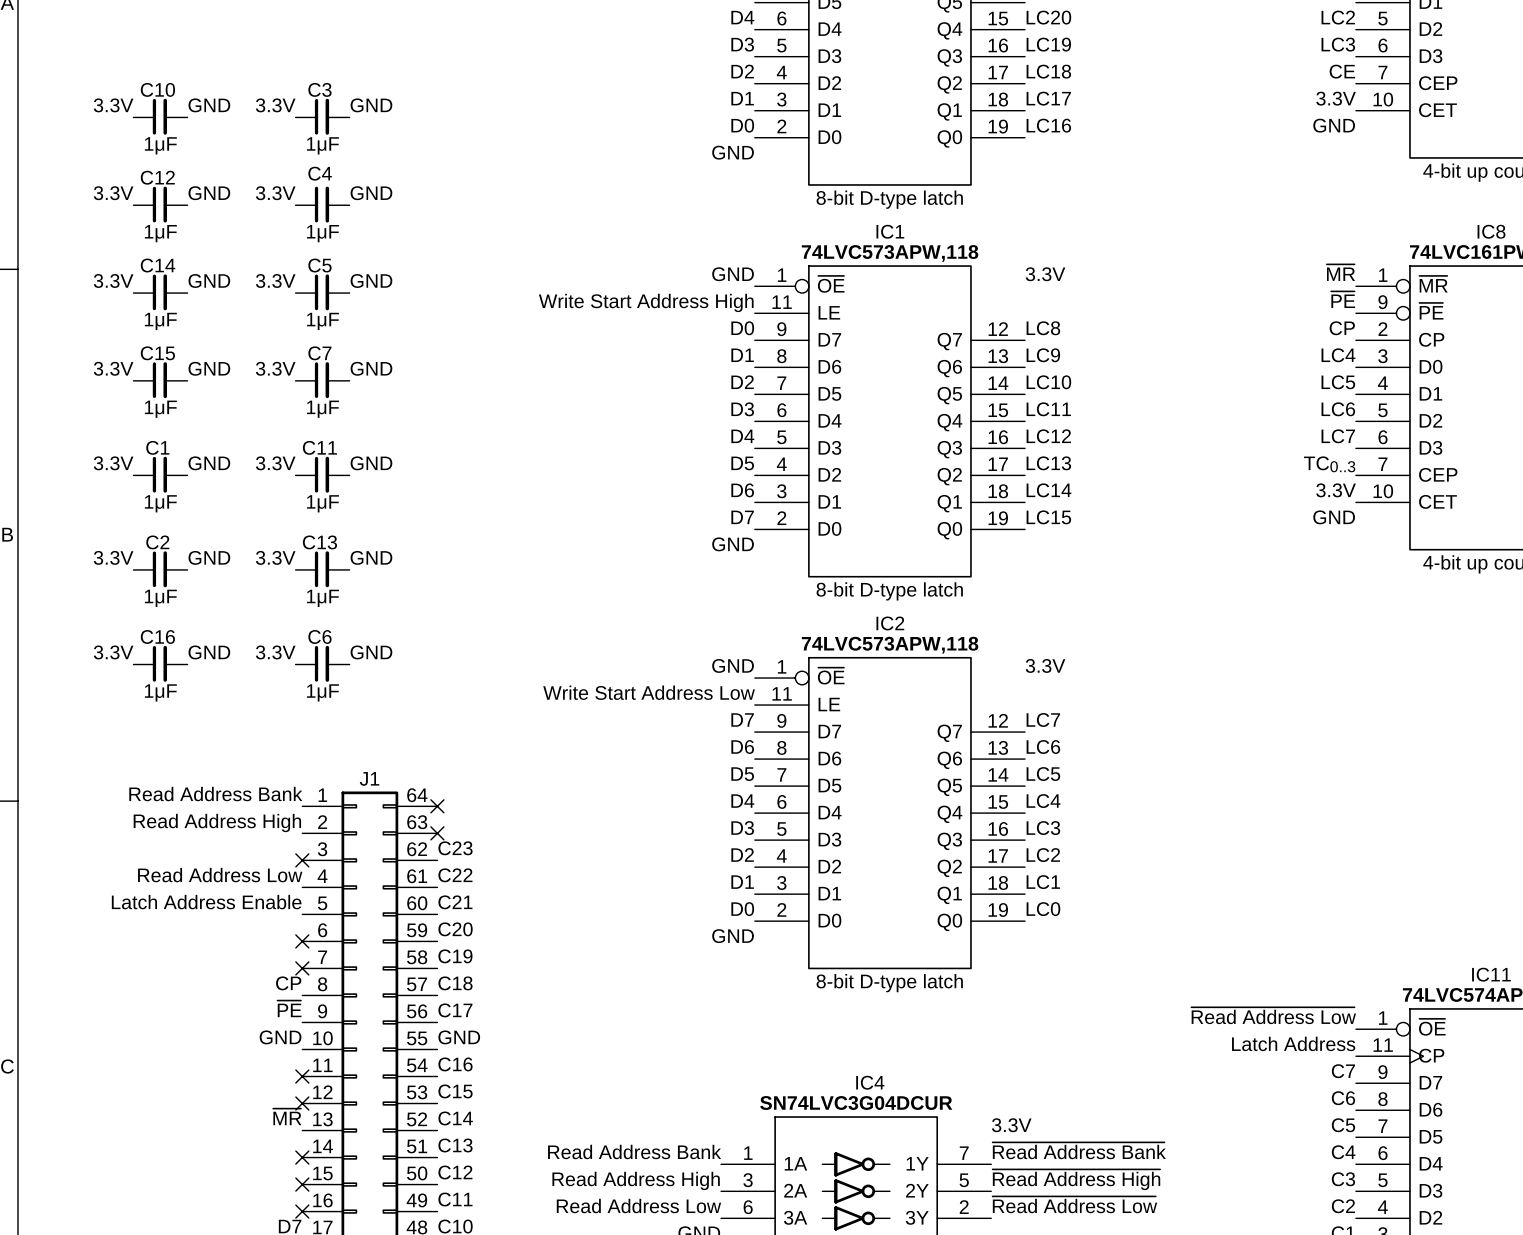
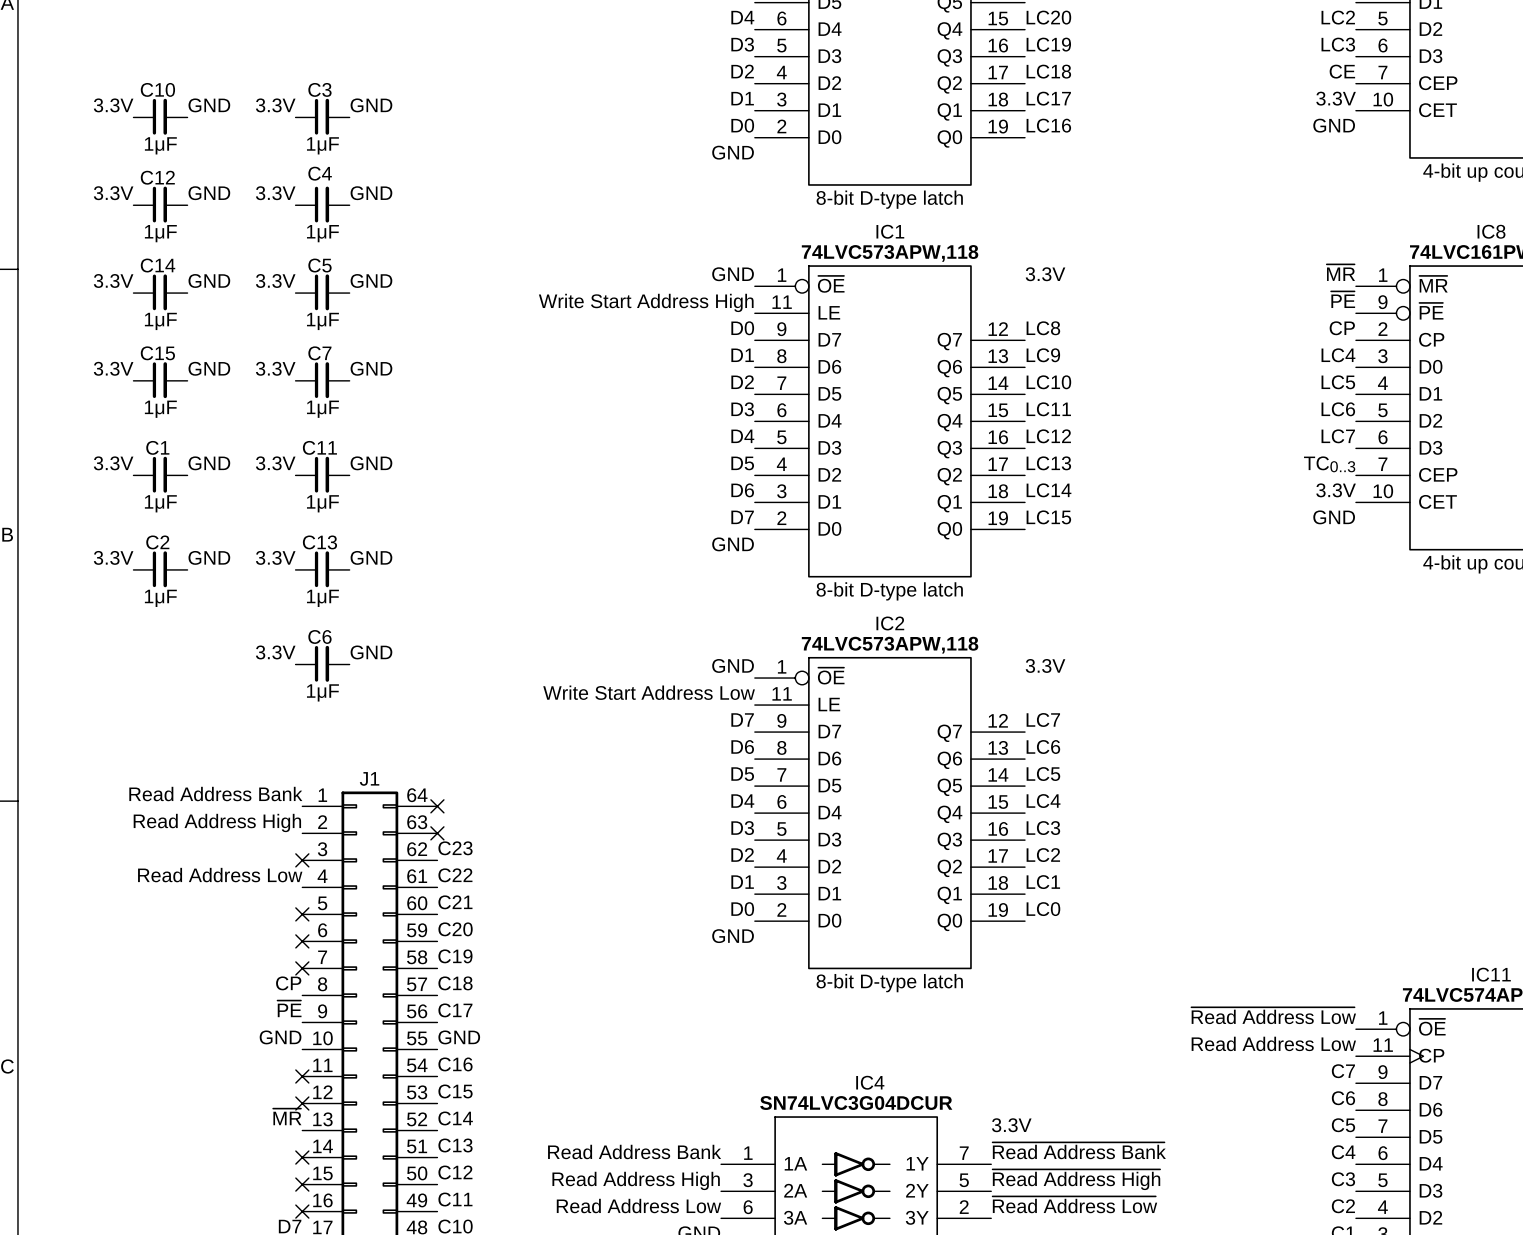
label: 3.3V (113, 652) -> none
label: GND (209, 652) -> none
C16: 1μF (160, 663) -> none
label: Latch Address Enable (206, 902) -> none
no-connect mark: none -> (302, 914)
label: Latch Address (1293, 1043) -> Read Address Low (1273, 1043)

